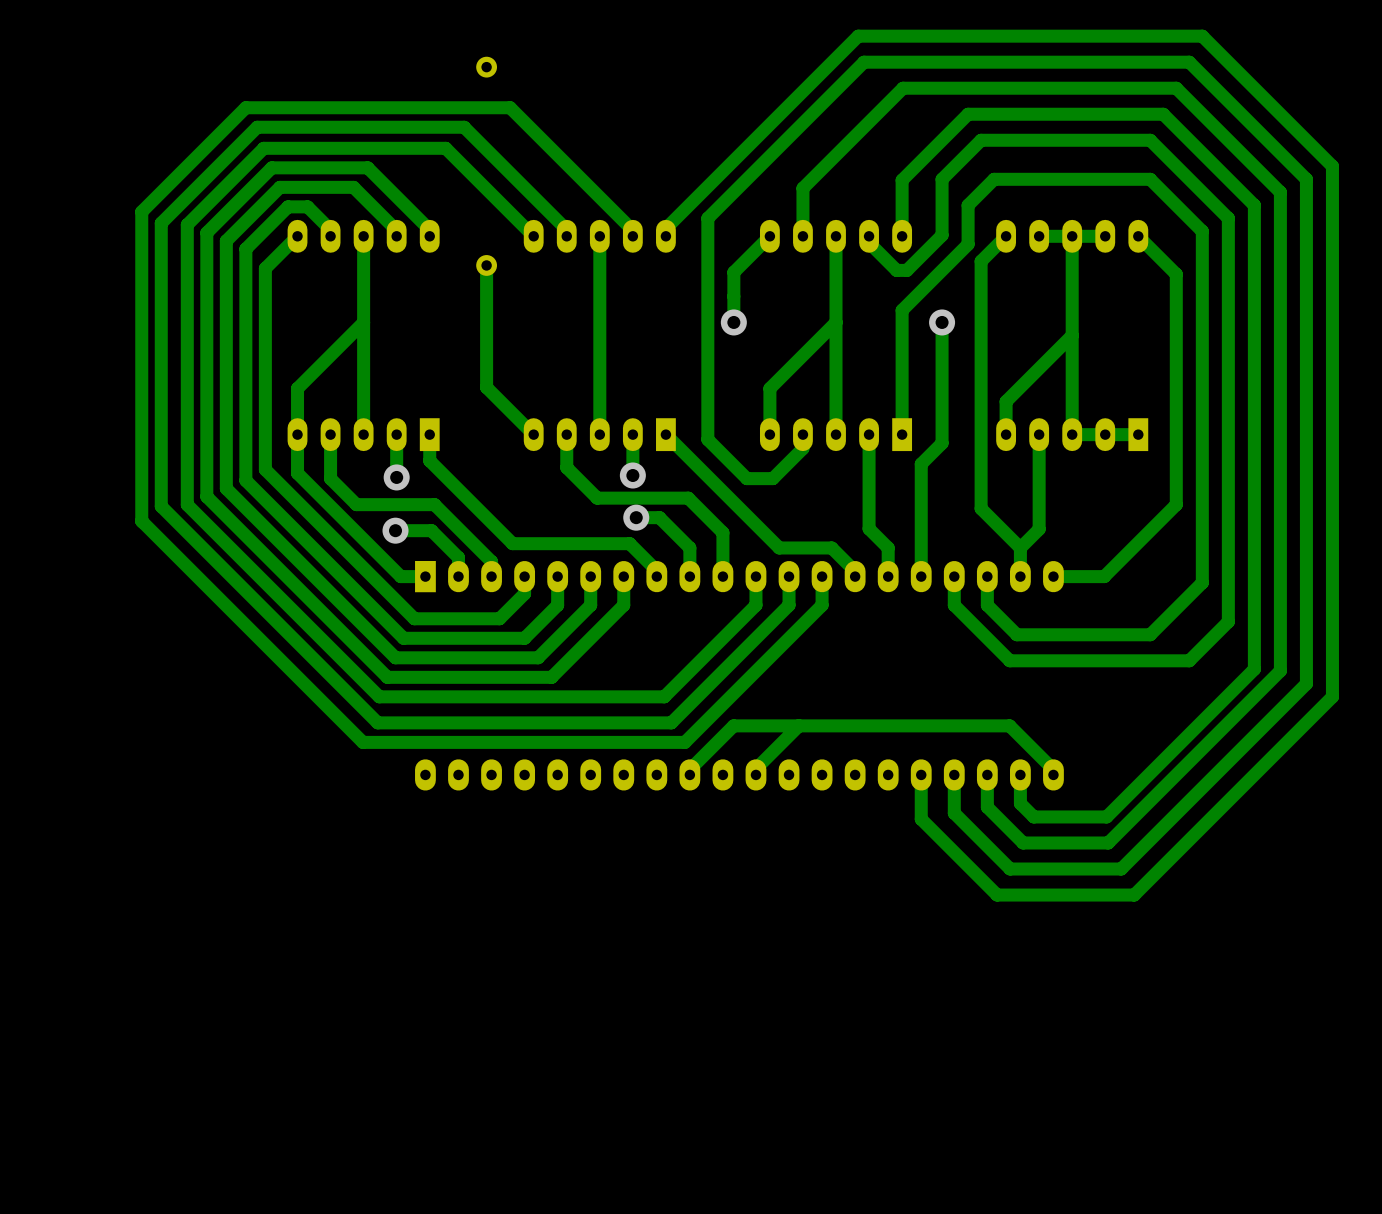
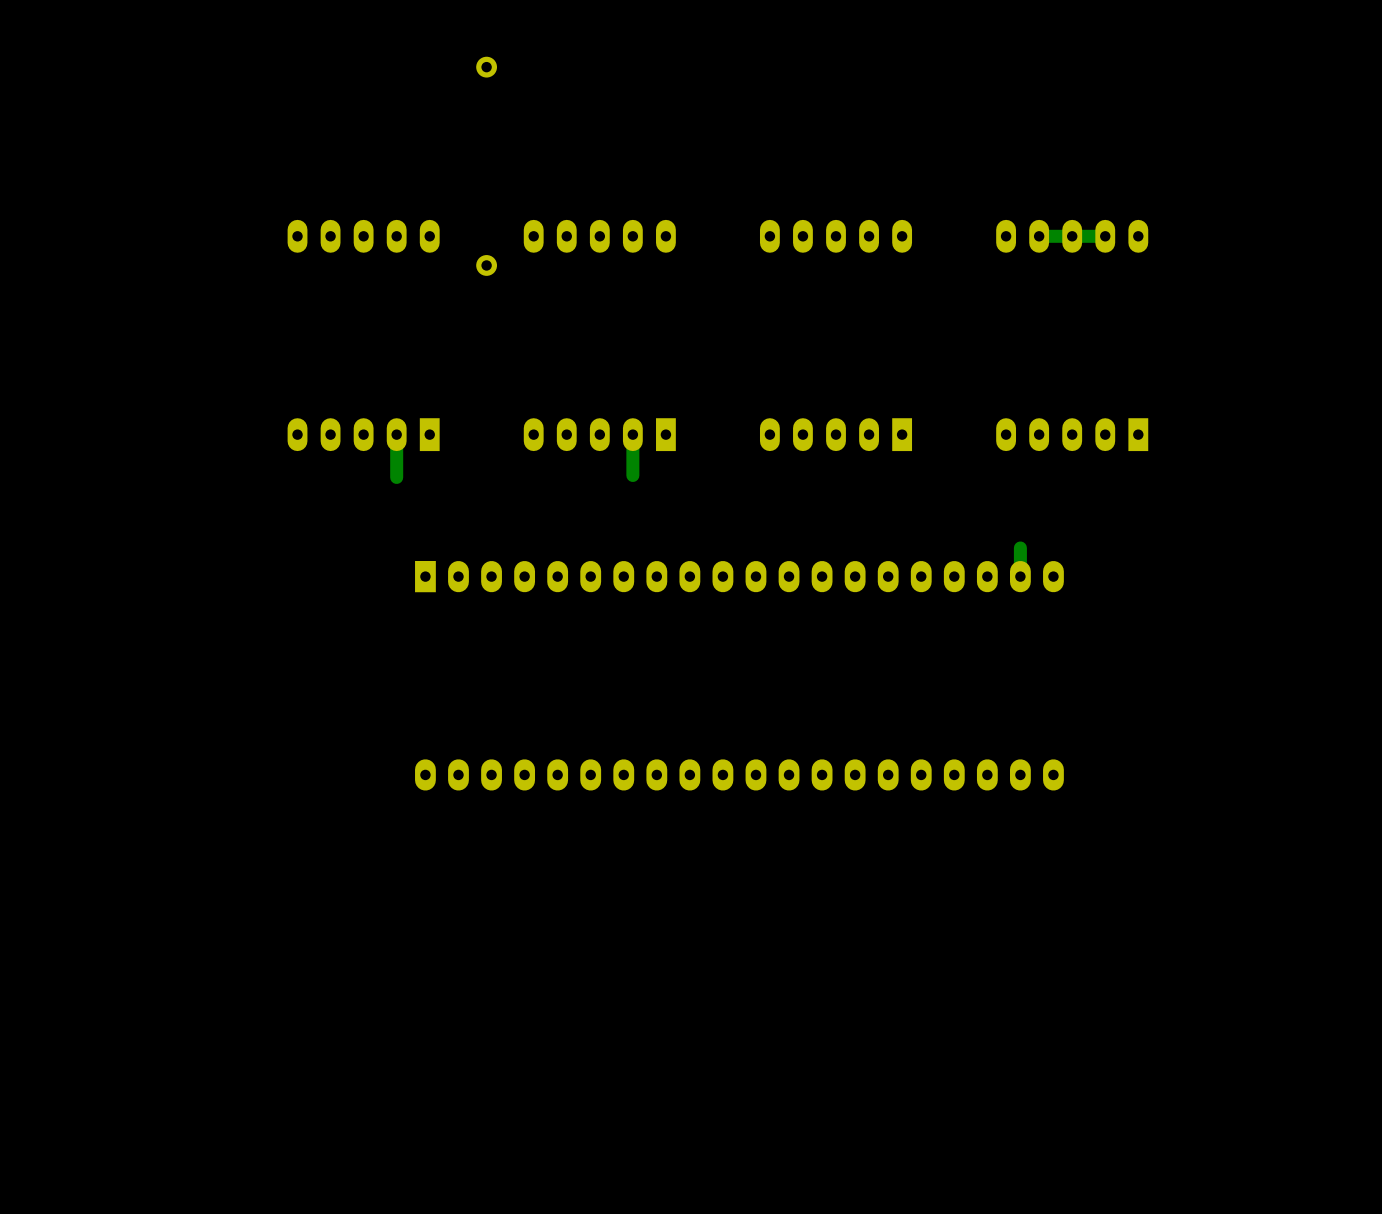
track: (297, 236) (265, 268) (265, 469) (414, 618) (499, 618) (524, 593) (524, 576) -> none
track: (330, 236) (330, 229) (307, 206) (288, 206) (245, 249) (245, 480) (403, 638) (524, 638) (557, 605) (557, 576) -> none
track: (363, 236) (363, 434) -> none
track: (396, 236) (396, 230) (353, 187) (279, 187) (226, 240) (226, 488) (395, 657) (538, 657) (590, 605) (590, 576) -> none
track: (429, 236) (429, 229) (367, 167) (271, 167) (206, 232) (206, 496) (387, 677) (551, 677) (623, 605) (623, 576) -> none
track: (533, 236) (445, 148) (263, 148) (187, 224) (187, 504) (379, 696) (664, 696) (755, 605) (755, 576) -> none
track: (566, 236) (566, 229) (464, 127) (257, 127) (161, 223) (161, 506) (377, 722) (671, 722) (789, 605) (789, 576) -> none
track: (599, 236) (599, 434) -> none
track: (632, 236) (632, 230) (510, 107) (245, 107) (141, 211) (141, 521) (362, 742) (684, 742) (822, 605) (822, 576) -> none
track: (665, 236) (665, 228) (858, 36) (1202, 36) (1332, 166) (1332, 696) (1134, 895) (997, 895) (921, 819) (921, 774) -> none
track: (769, 236) (733, 272) (733, 322) -> none
track: (802, 236) (802, 188) (903, 88) (1176, 88) (1280, 192) (1280, 670) (1108, 842) (1023, 842) (987, 807) (987, 774) -> none
track: (836, 236) (836, 434) -> none
track: (869, 236) (869, 242) (896, 270) (906, 270) (942, 235) (942, 179) (981, 140) (1150, 140) (1228, 218) (1228, 621) (1189, 660) (1009, 660) (954, 605) (954, 576) -> none
track: (902, 236) (902, 180) (968, 114) (1163, 114) (1254, 205) (1254, 669) (1106, 816) (1033, 816) (1020, 803) (1020, 774) -> none
track: (1006, 236) (981, 261) (981, 508) (1020, 547) (1039, 529) (1039, 434) -> none
track: (1072, 236) (1072, 434) (1138, 434) -> none
track: (1138, 236) (1176, 274) (1176, 504) (1104, 576) (1053, 576) -> none
track: (486, 265) (486, 387) (533, 434) -> none
track: (363, 322) (297, 388) (297, 473) (400, 576) (425, 576) -> none
via: (733, 322) -> none
track: (836, 322) (769, 388) (769, 434) -> none
track: (942, 322) (942, 443) (921, 464) (921, 576) -> none
via: (942, 322) -> none
track: (1072, 335) (1006, 401) (1006, 434) -> none
track: (330, 434) (330, 478) (356, 504) (434, 504) (491, 561) (491, 576) -> none
track: (429, 434) (429, 460) (512, 543) (629, 543) (656, 570) (656, 576) -> none
track: (566, 434) (566, 467) (597, 498) (688, 498) (722, 532) (722, 576) -> none
track: (665, 434) (779, 547) (831, 547) (855, 571) (855, 576) -> none
track: (802, 434) (802, 448) (772, 478) (746, 478) (707, 439) (707, 218) (863, 62) (1189, 62) (1306, 179) (1306, 683) (1121, 869) (1010, 869) (954, 813) (954, 774) -> none
track: (869, 434) (869, 528) (888, 547) (888, 576) -> none
track: (902, 434) (902, 310) (968, 244) (968, 205) (994, 179) (1150, 179) (1202, 231) (1202, 582) (1150, 634) (1016, 634) (987, 605) (987, 576) -> none
via: (632, 475) -> none
via: (396, 477) -> none
track: (636, 517) (659, 517) (689, 547) (689, 576) -> none
via: (636, 517) -> none
track: (395, 530) (431, 530) (458, 557) (458, 576) -> none
via: (395, 530) -> none
track: (798, 725) (755, 768) (755, 774) -> none
track: (1053, 774) (1053, 769) (1009, 725) (733, 725) (689, 769) (689, 774) -> none

